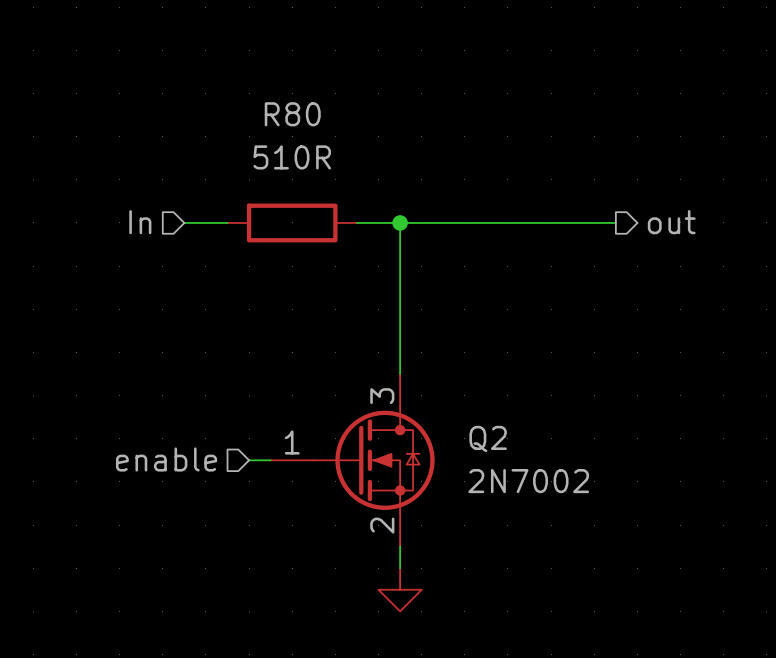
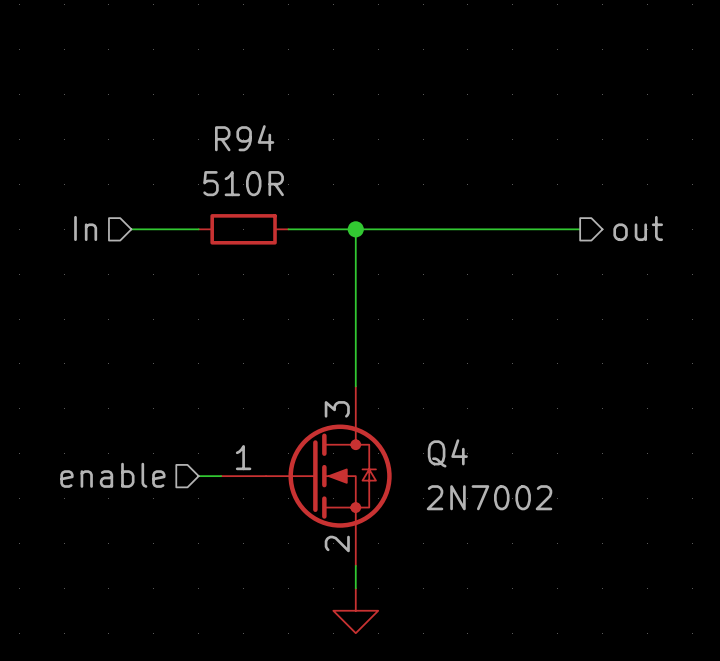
R80: 510R (292, 222) -> none
R94: none -> 510R (243, 229)
Q2 name: Q2 (488, 438) -> Q4 (447, 453)

